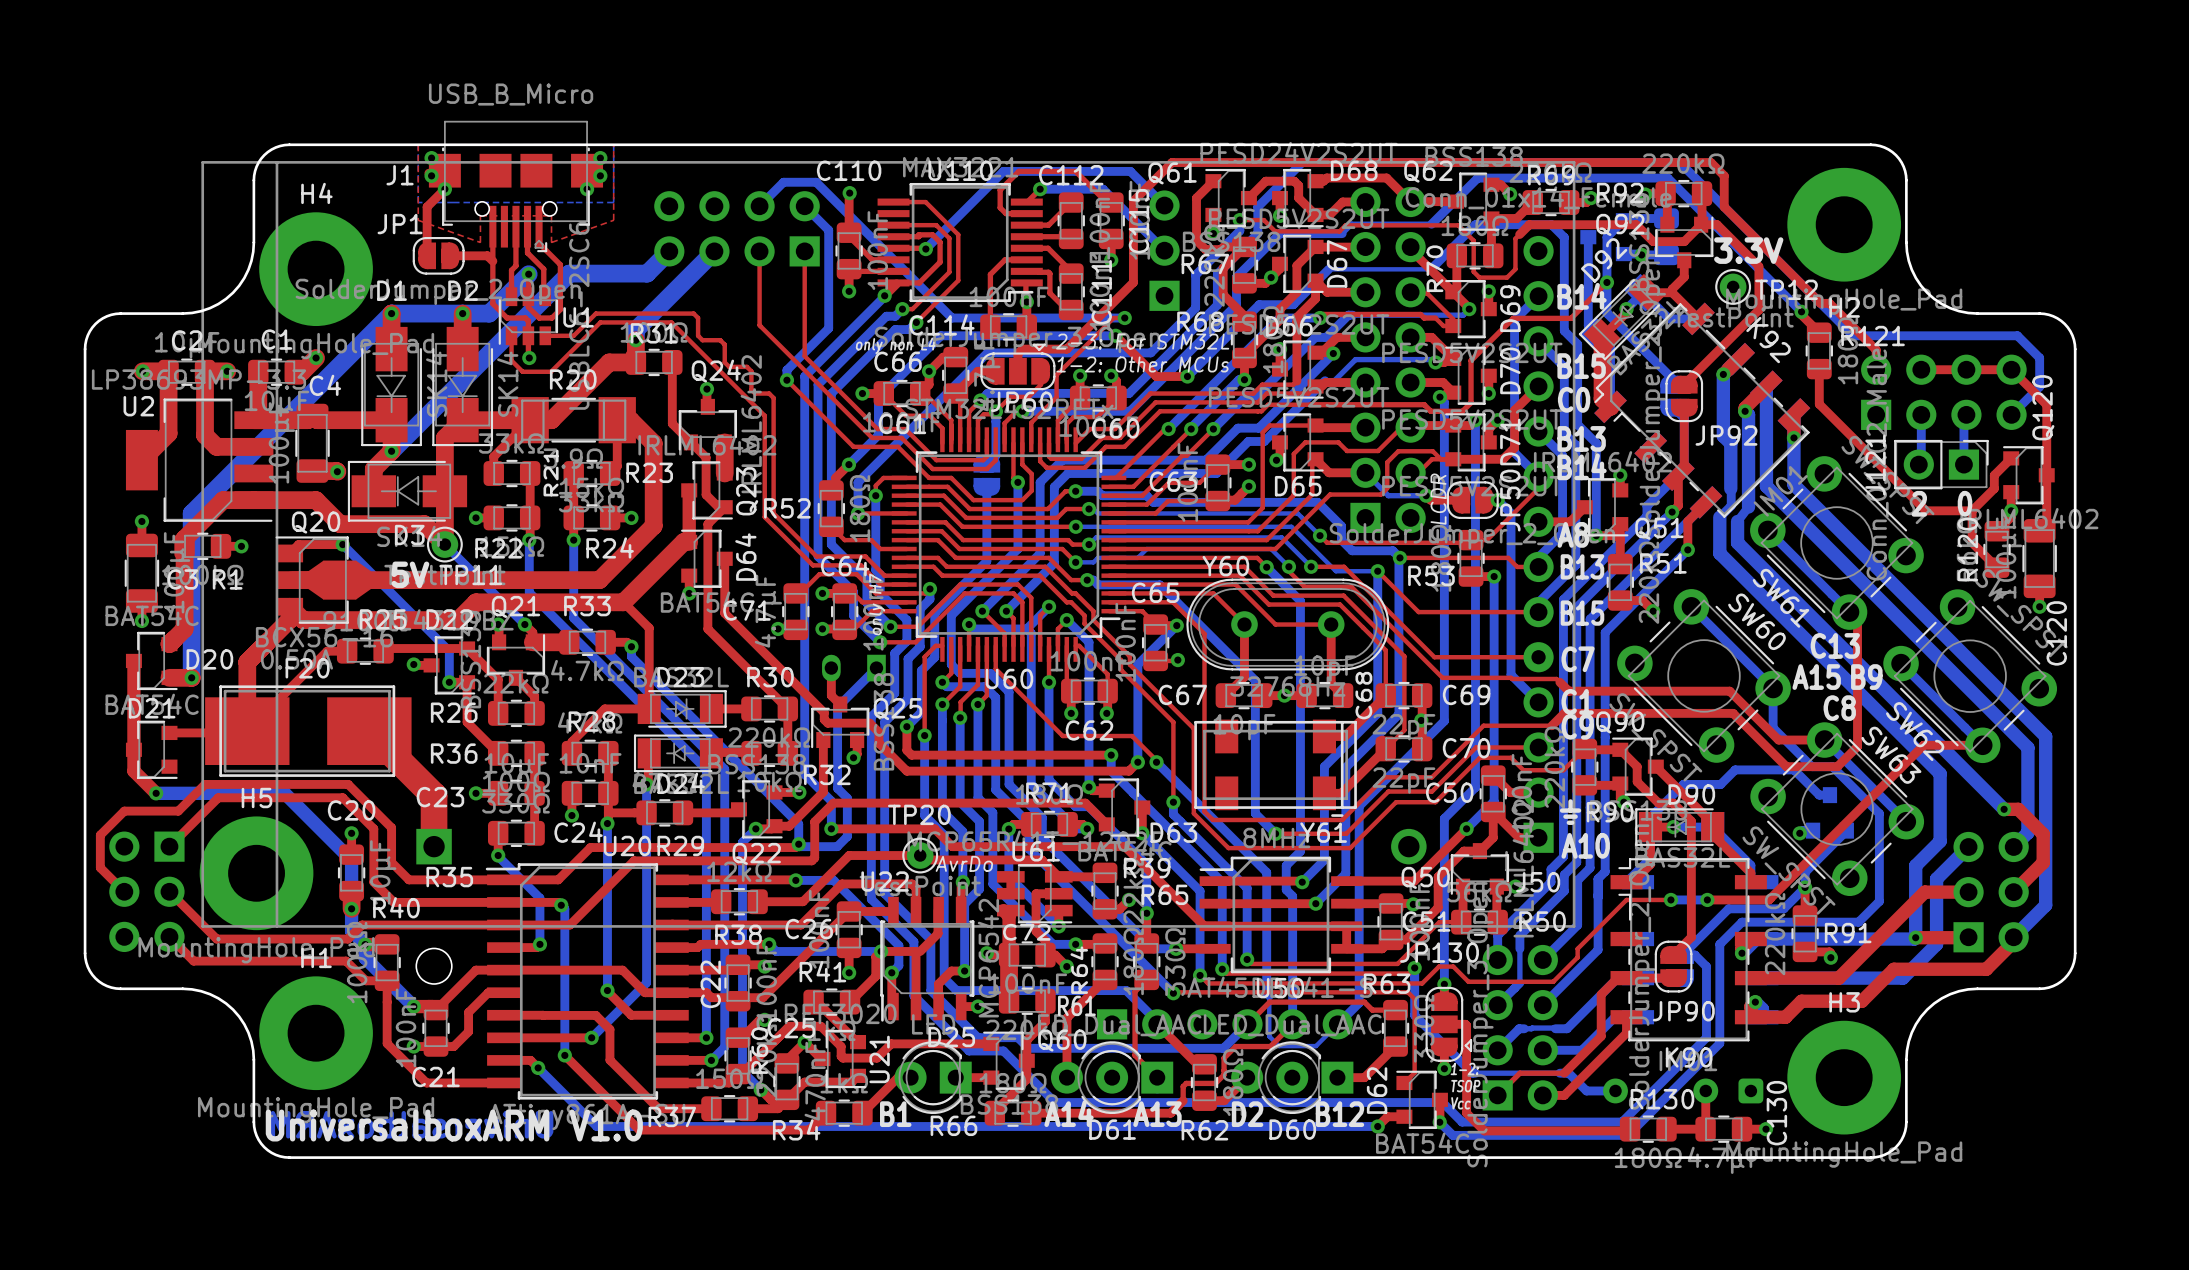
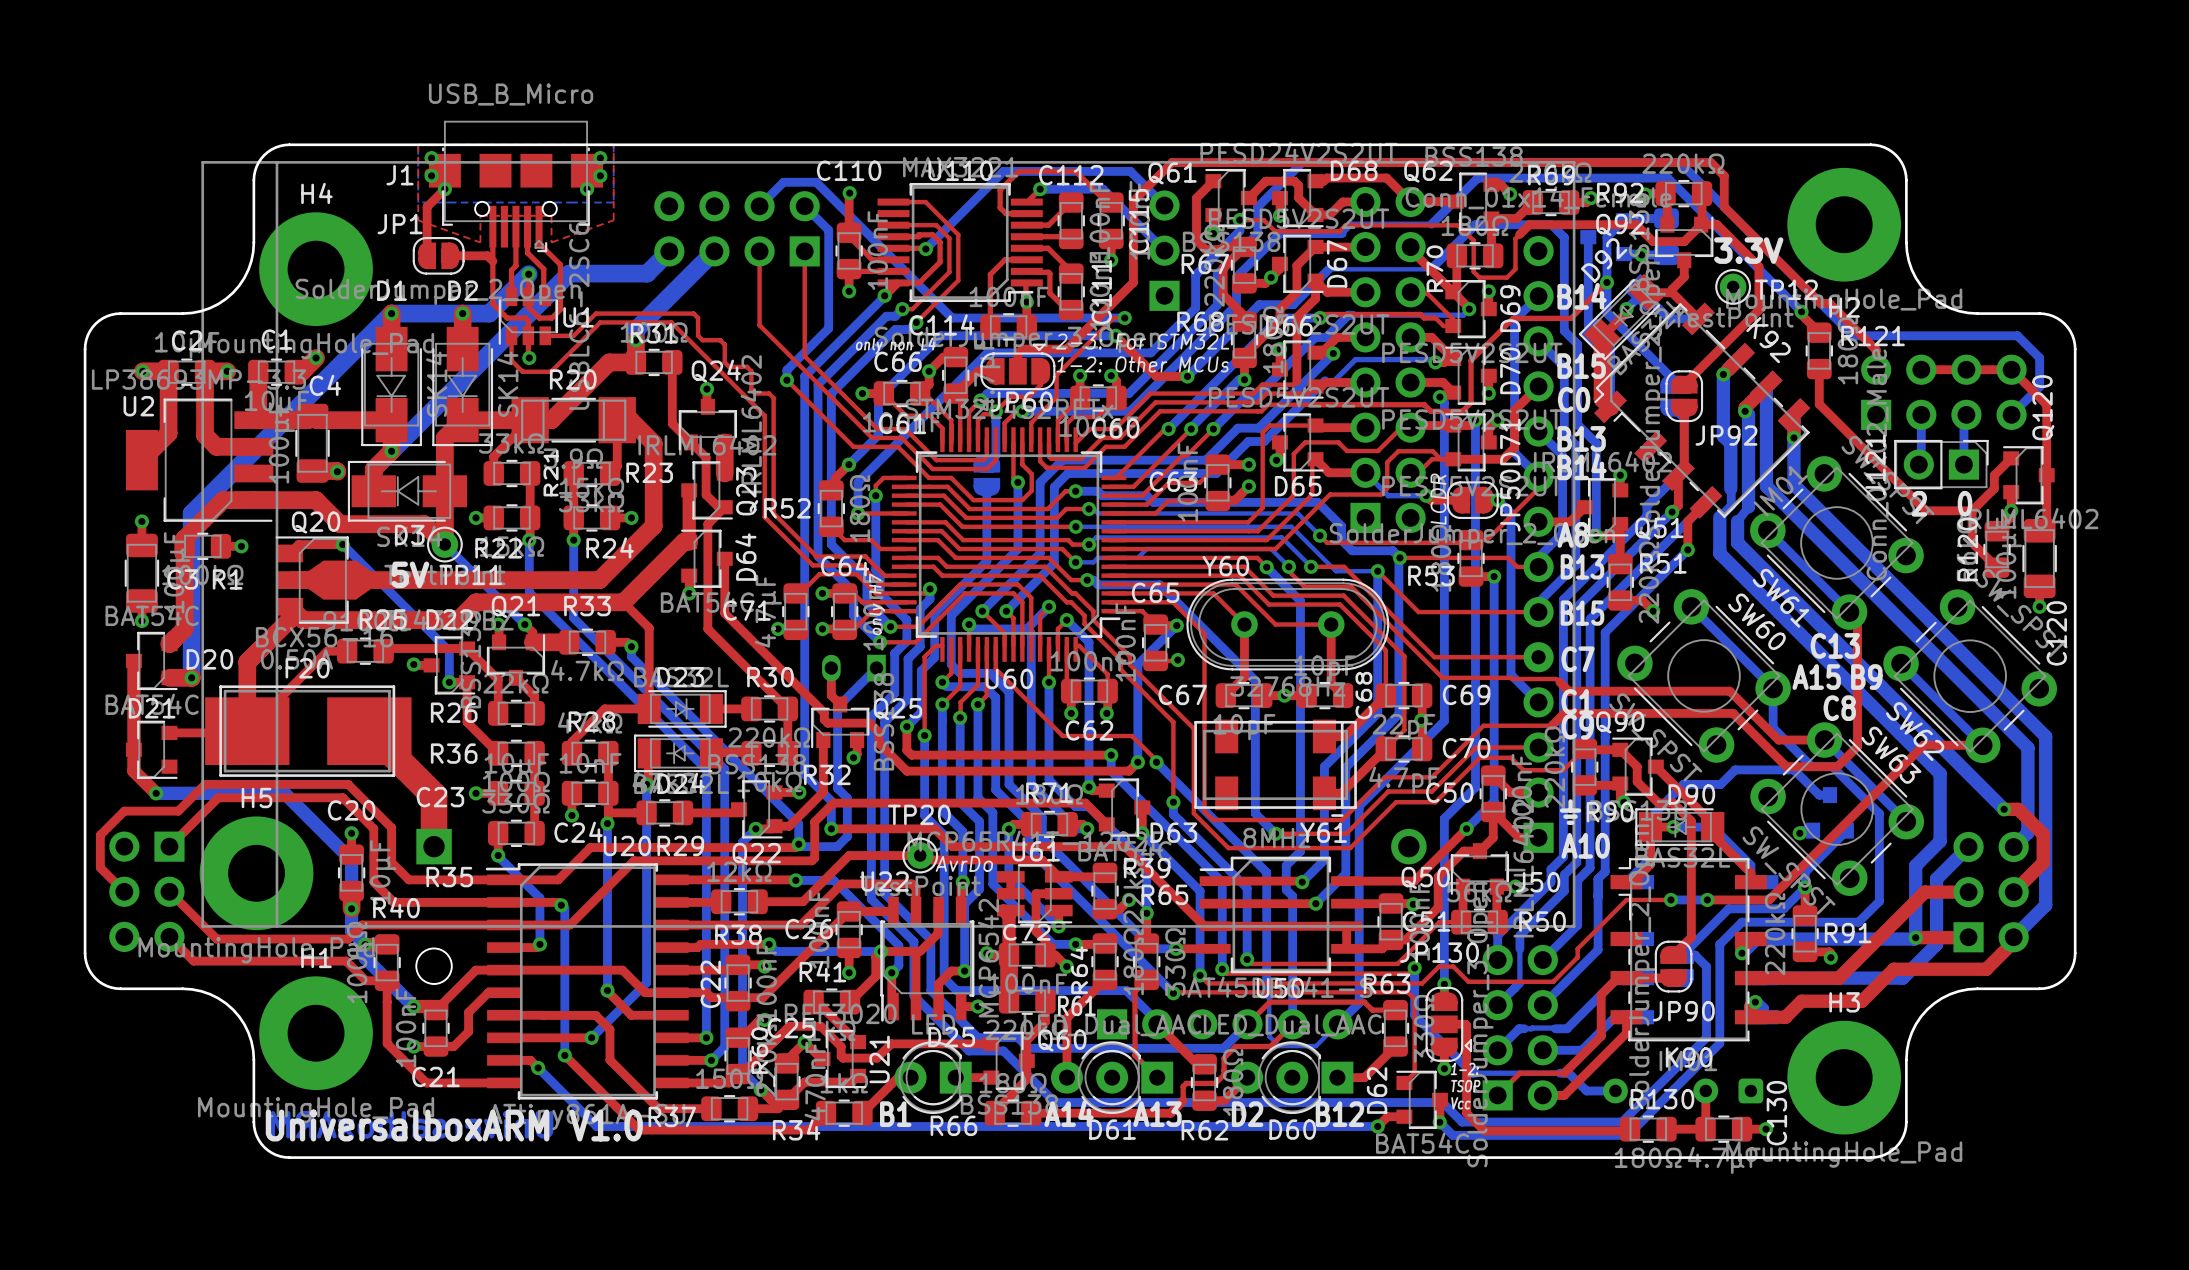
C70 value: 22pF (1403, 780) -> 4.7pF (1404, 780)

